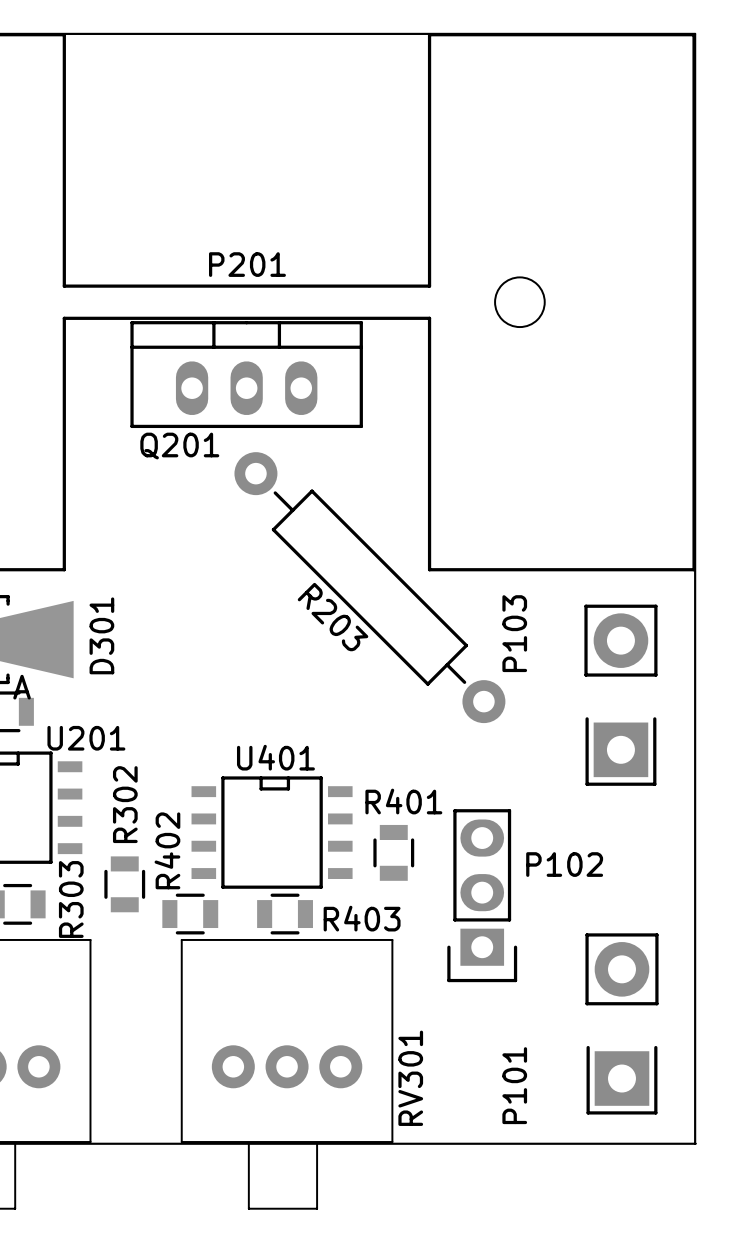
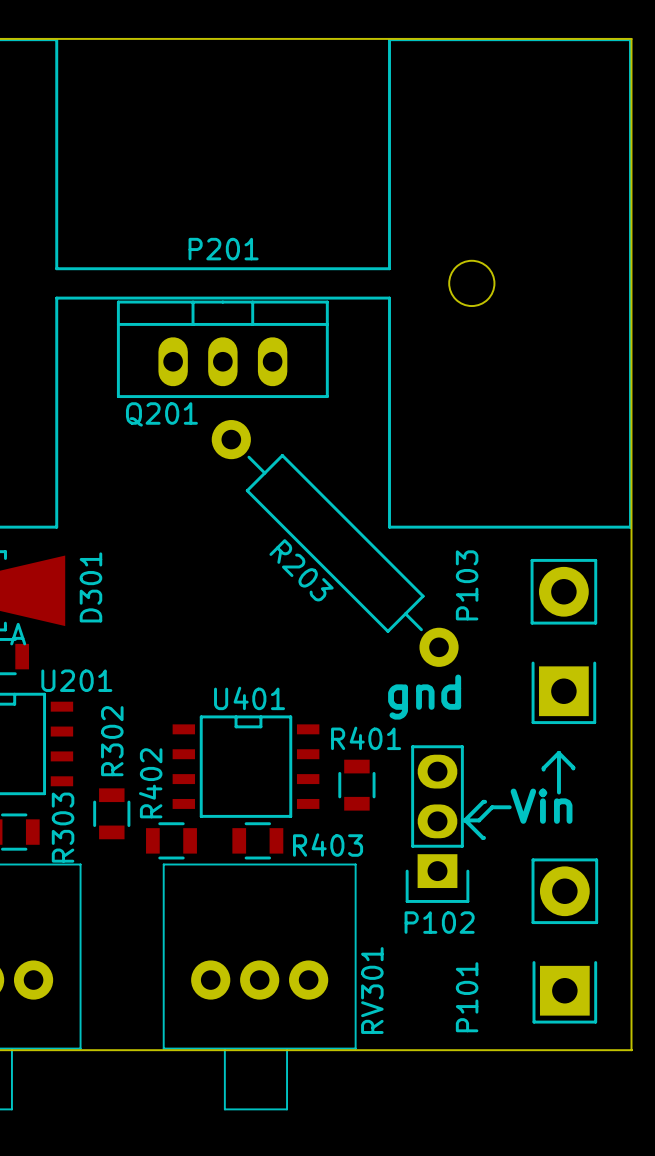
text: none -> gnd (424, 697)
line: none -> (559, 752) (543, 769)
line: none -> (558, 753) (558, 792)
line: none -> (559, 753) (573, 768)
P102 name position: P102 (564, 864) -> P102 (439, 922)
line: none -> (485, 801) (464, 820)
text: none -> Vin (541, 806)
line: none -> (509, 807) (492, 807) (479, 820) (464, 820)
line: none -> (465, 820) (484, 837)

